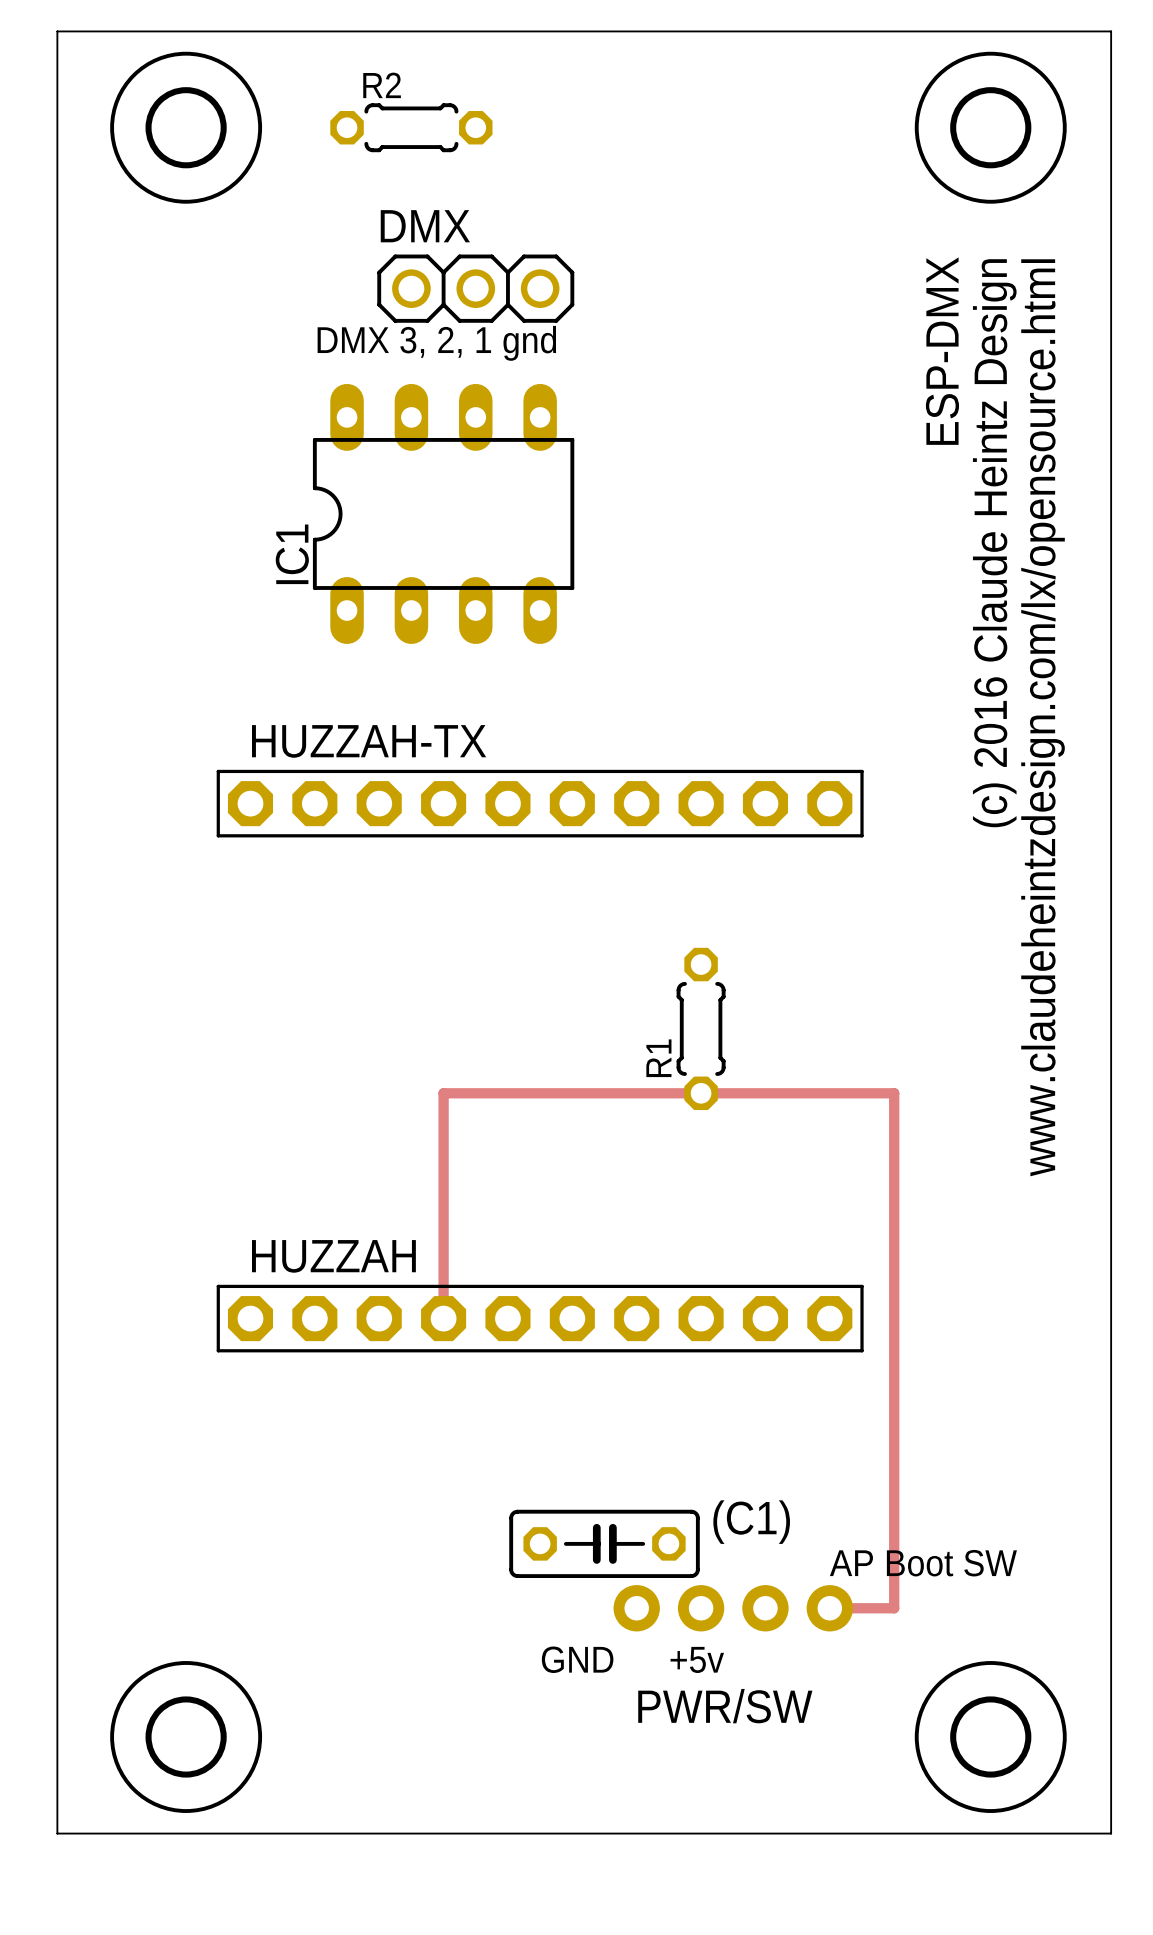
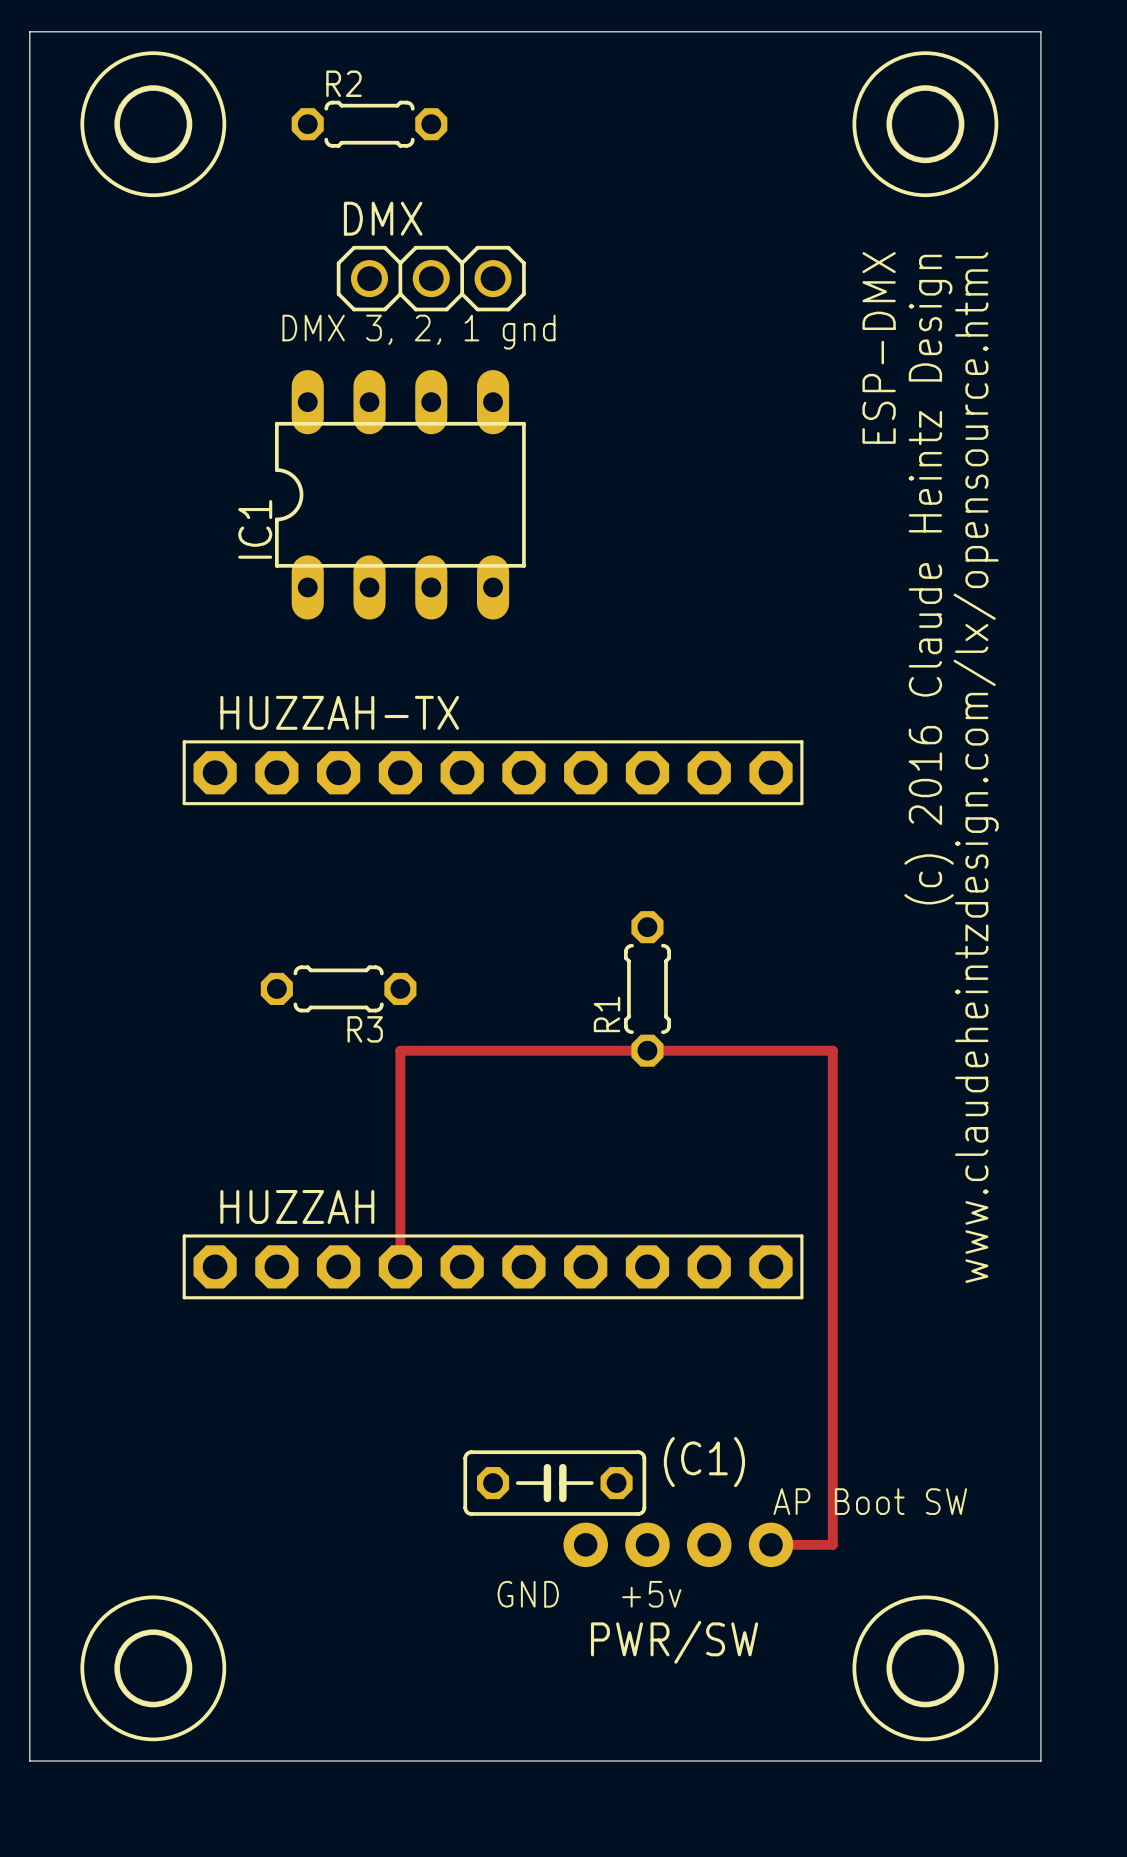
R3: none -> (338, 988)

